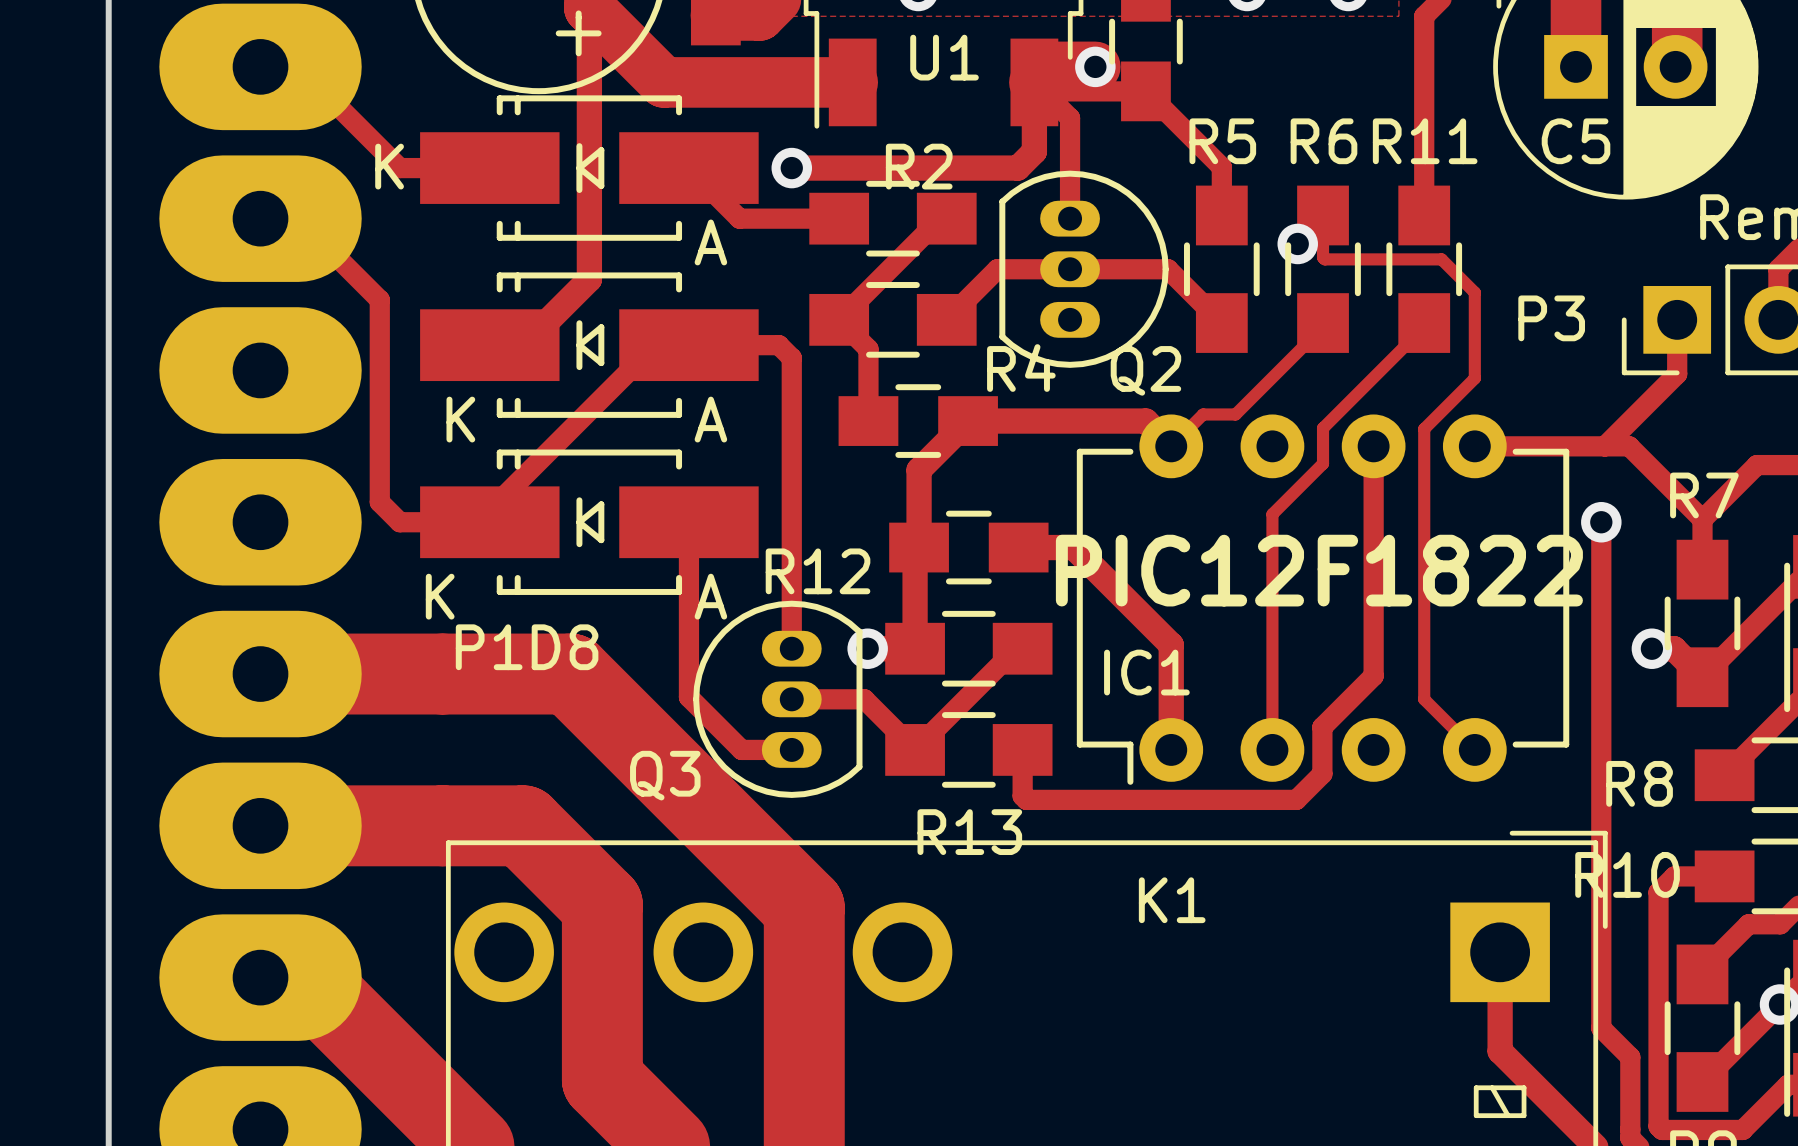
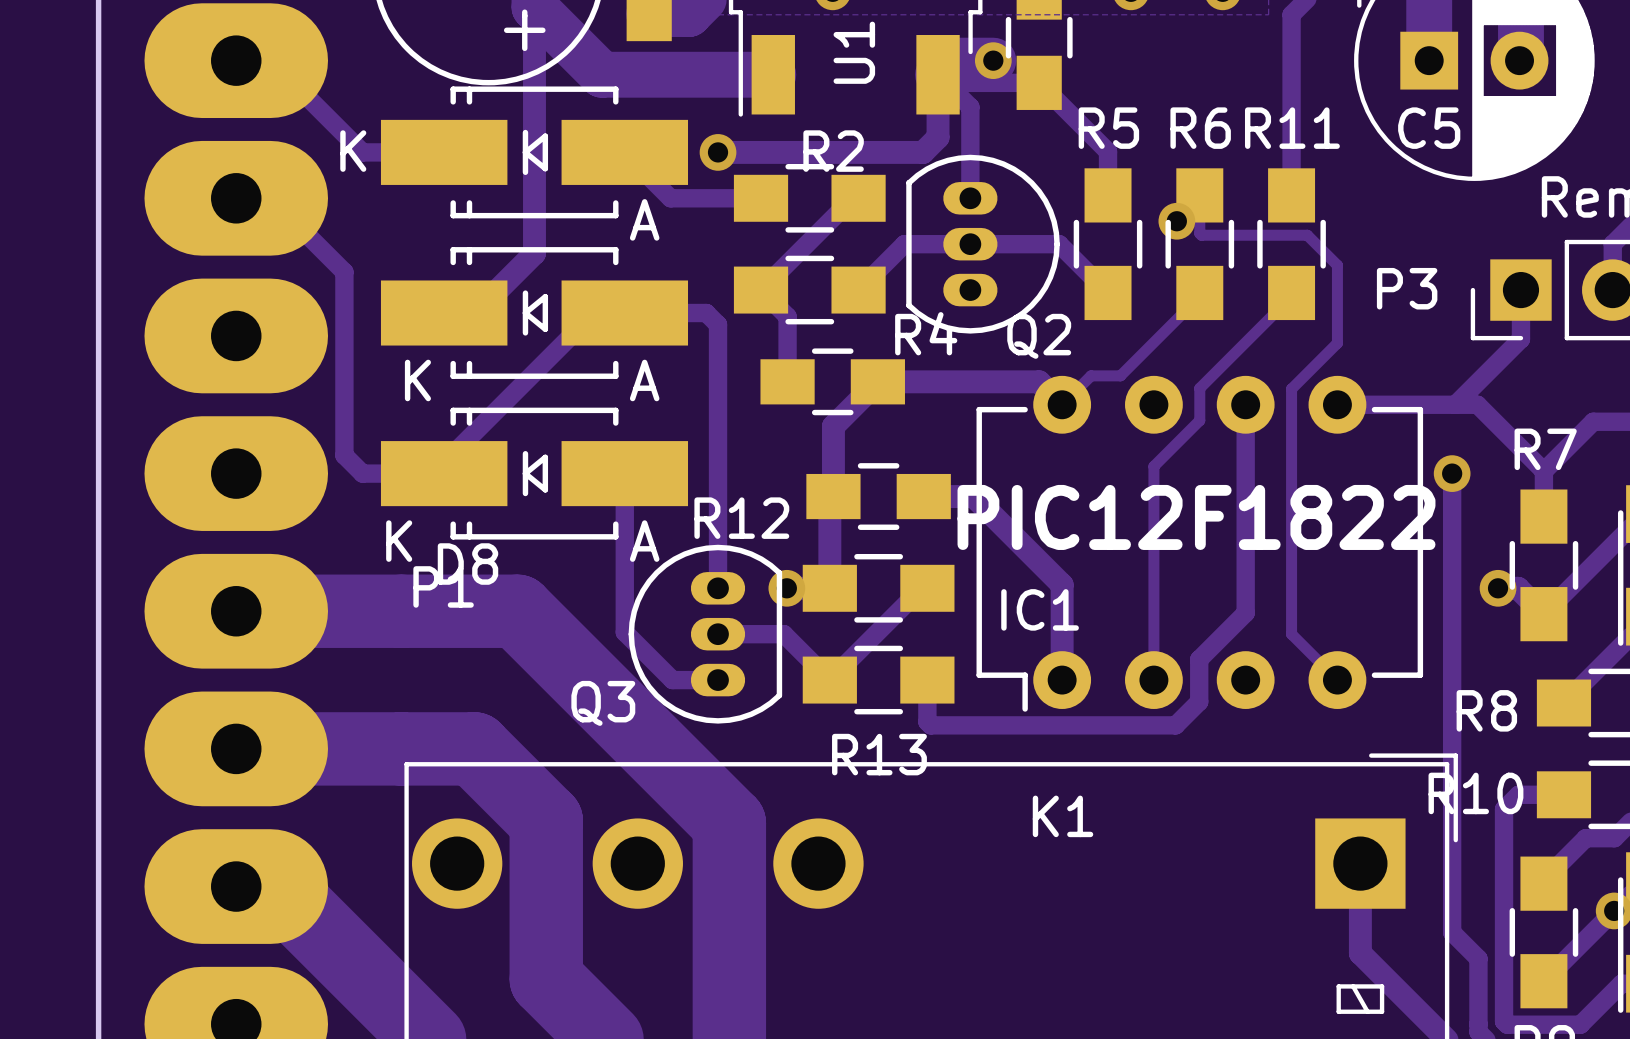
U1 name rotation: 0° (944, 57) -> 90° counterclockwise (854, 52)
D8 name position: D8 (565, 647) -> D8 (467, 564)

